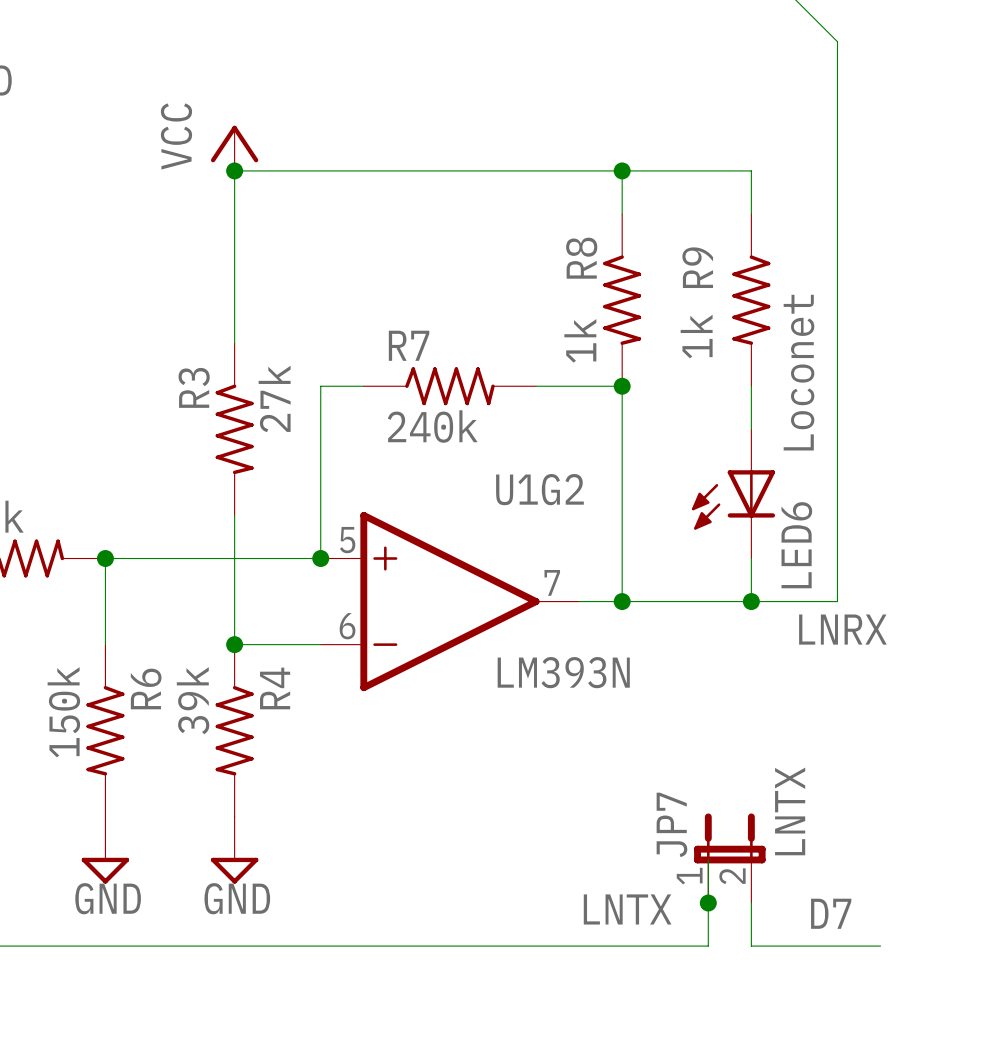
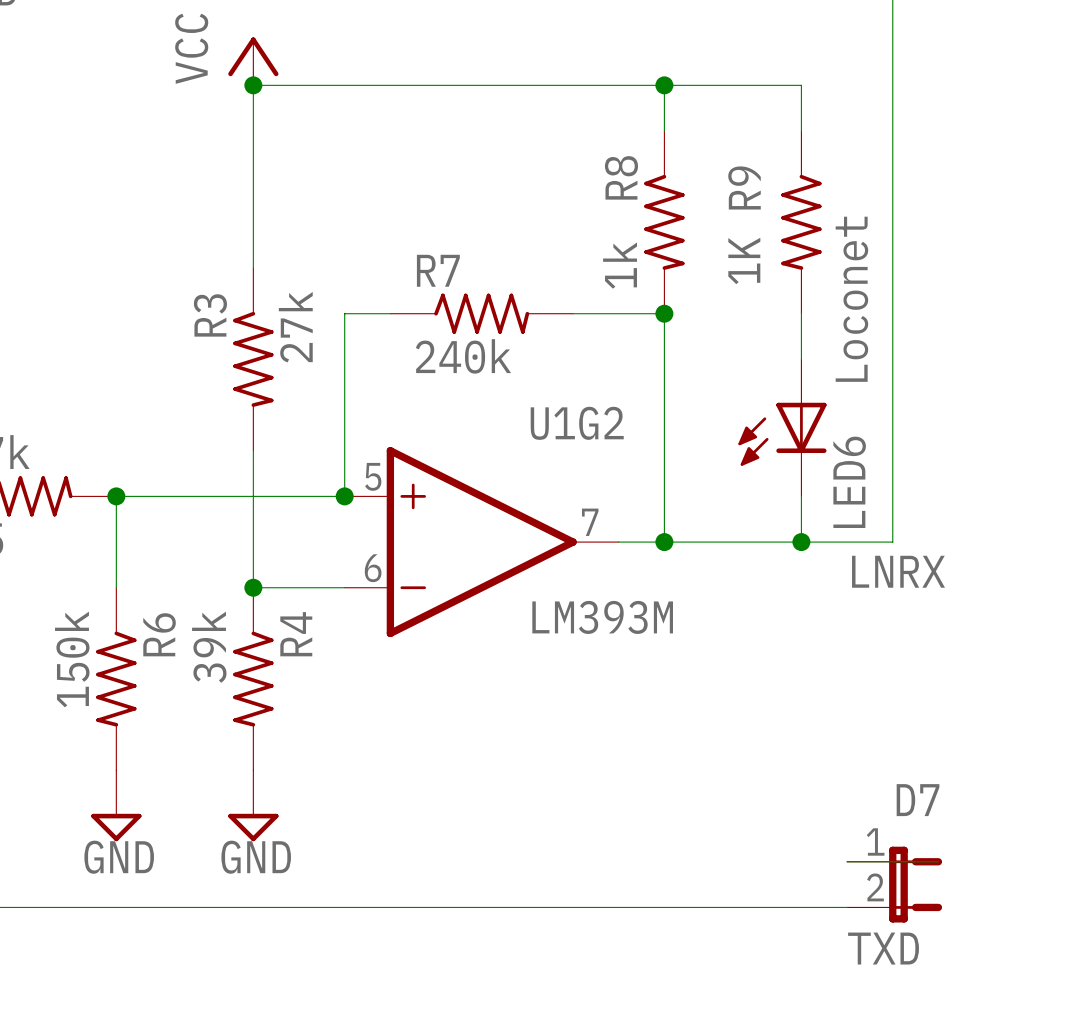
R9 value: 1k (696, 336) -> 1K (744, 260)
U1G2 value: LM393N (563, 672) -> LM393M (602, 617)
JP7: LNTX (729, 858) -> none
wire: (708, 859) (708, 946) -> none
junction: (708, 903) -> none
wire: (751, 903) (751, 946) -> (755, 907) (801, 907)
label: LNTX (627, 909) -> none
label position: D7 (831, 913) -> D7 (918, 800)
part: none -> TXD (894, 884)

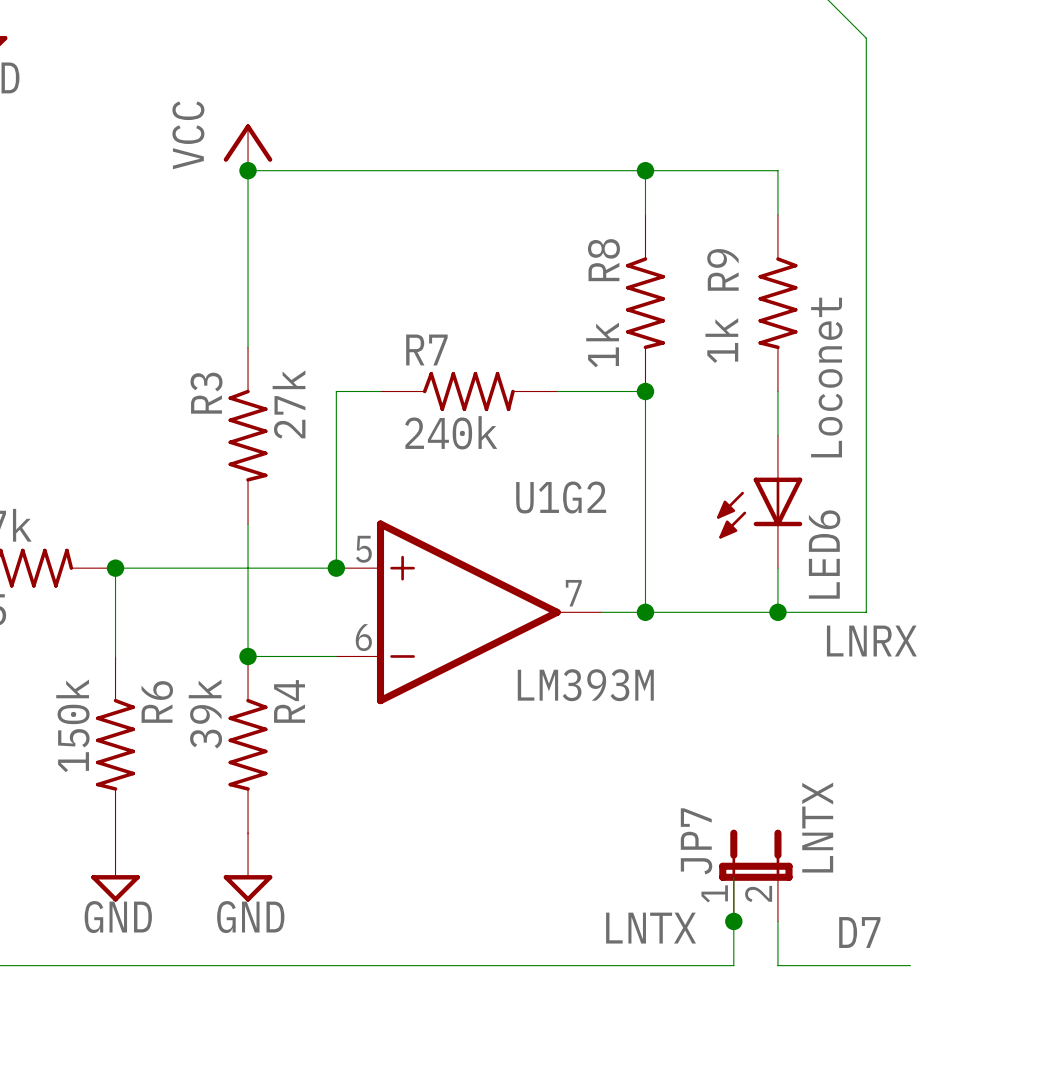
R9 value: 1K (744, 260) -> 1k (721, 340)
label position: D7 (918, 800) -> D7 (859, 932)
JP7: none -> LNTX (755, 875)
wire: none -> (733, 877) (733, 965)
junction: none -> (733, 921)
label: none -> LNTX (651, 928)
part: TXD (894, 884) -> none
wire: (755, 907) (801, 907) -> (777, 921) (777, 965)

